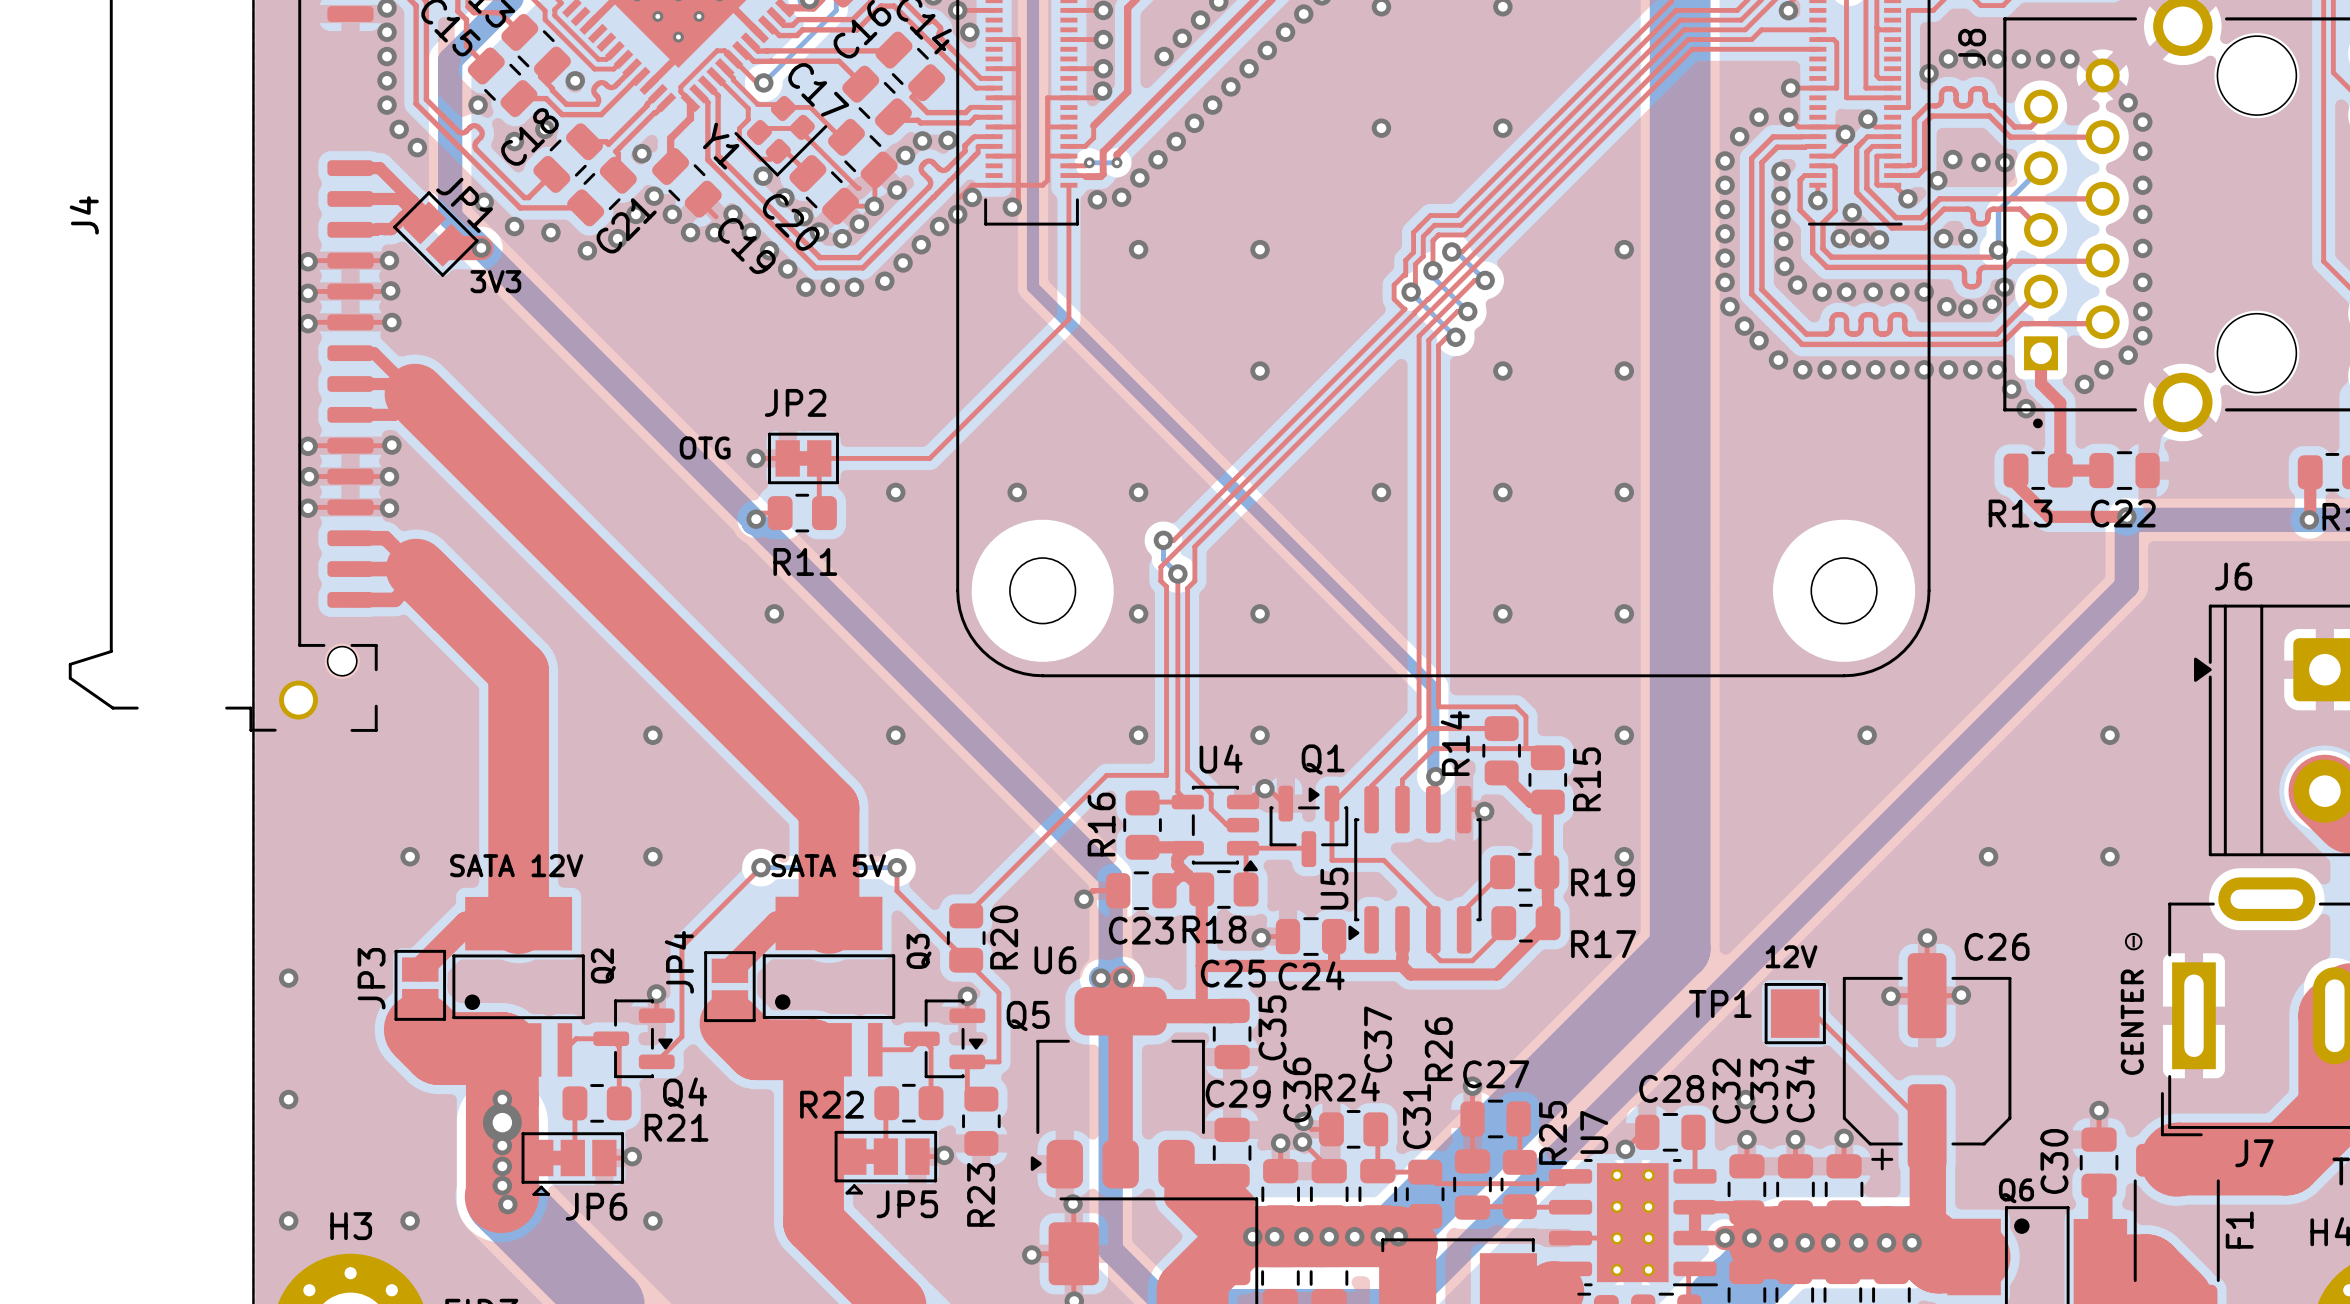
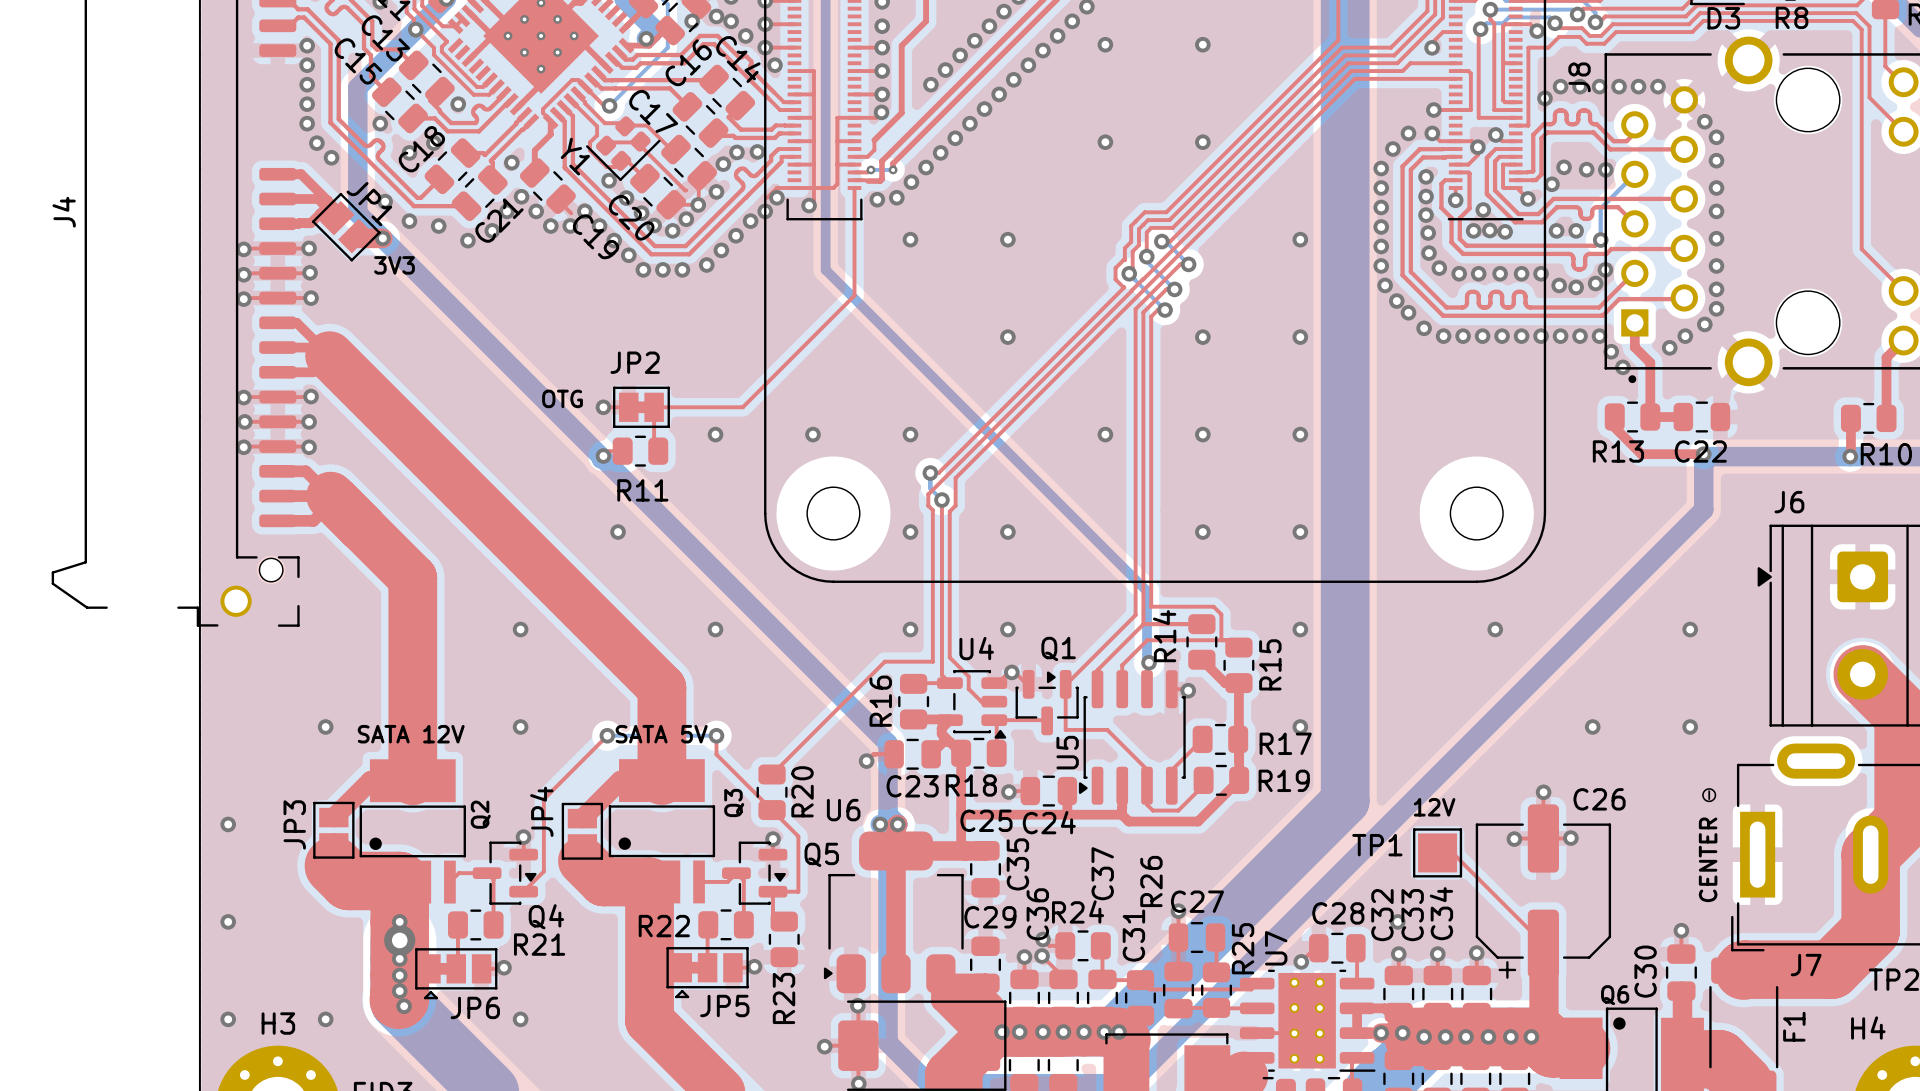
R19 name position: R19 (1603, 882) -> R19 (1284, 780)
R17 name position: R17 (1603, 944) -> R17 (1285, 743)

